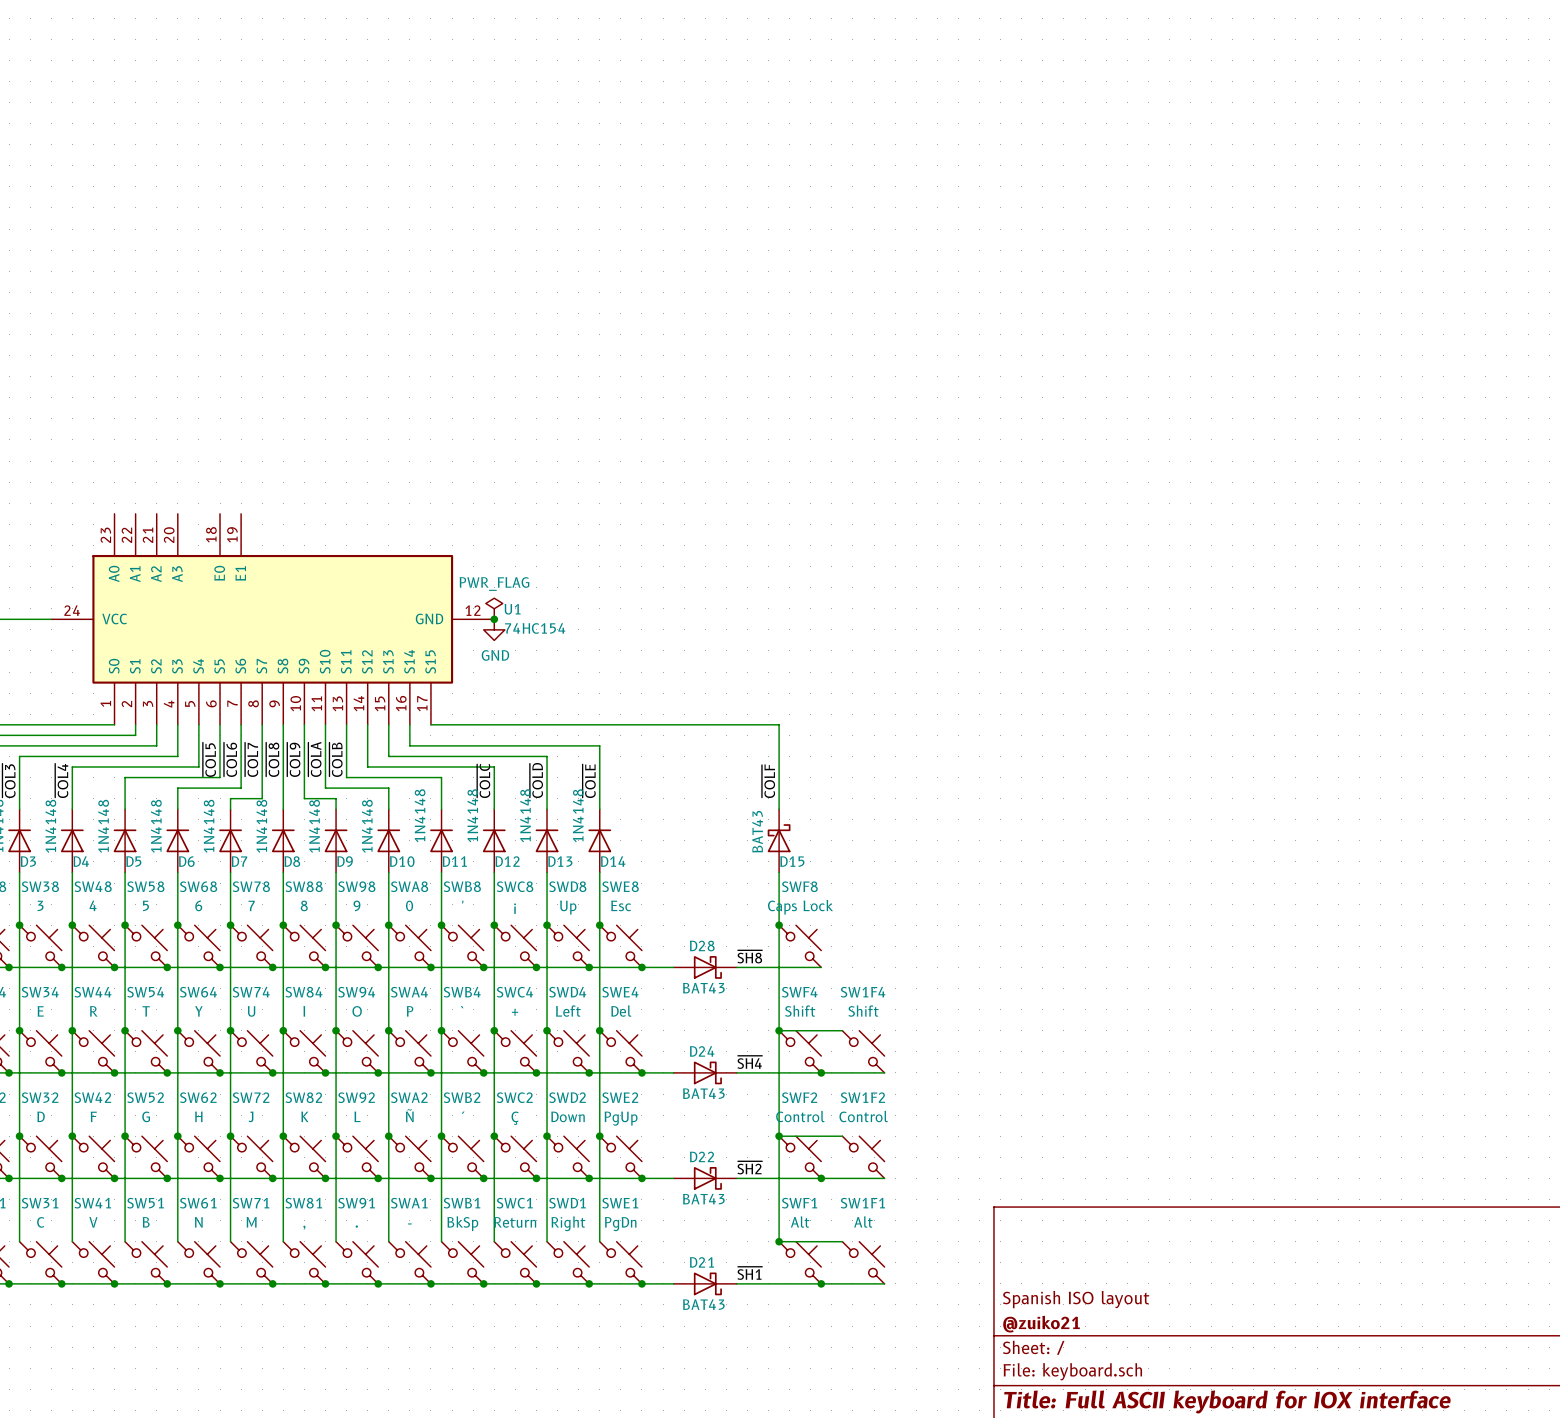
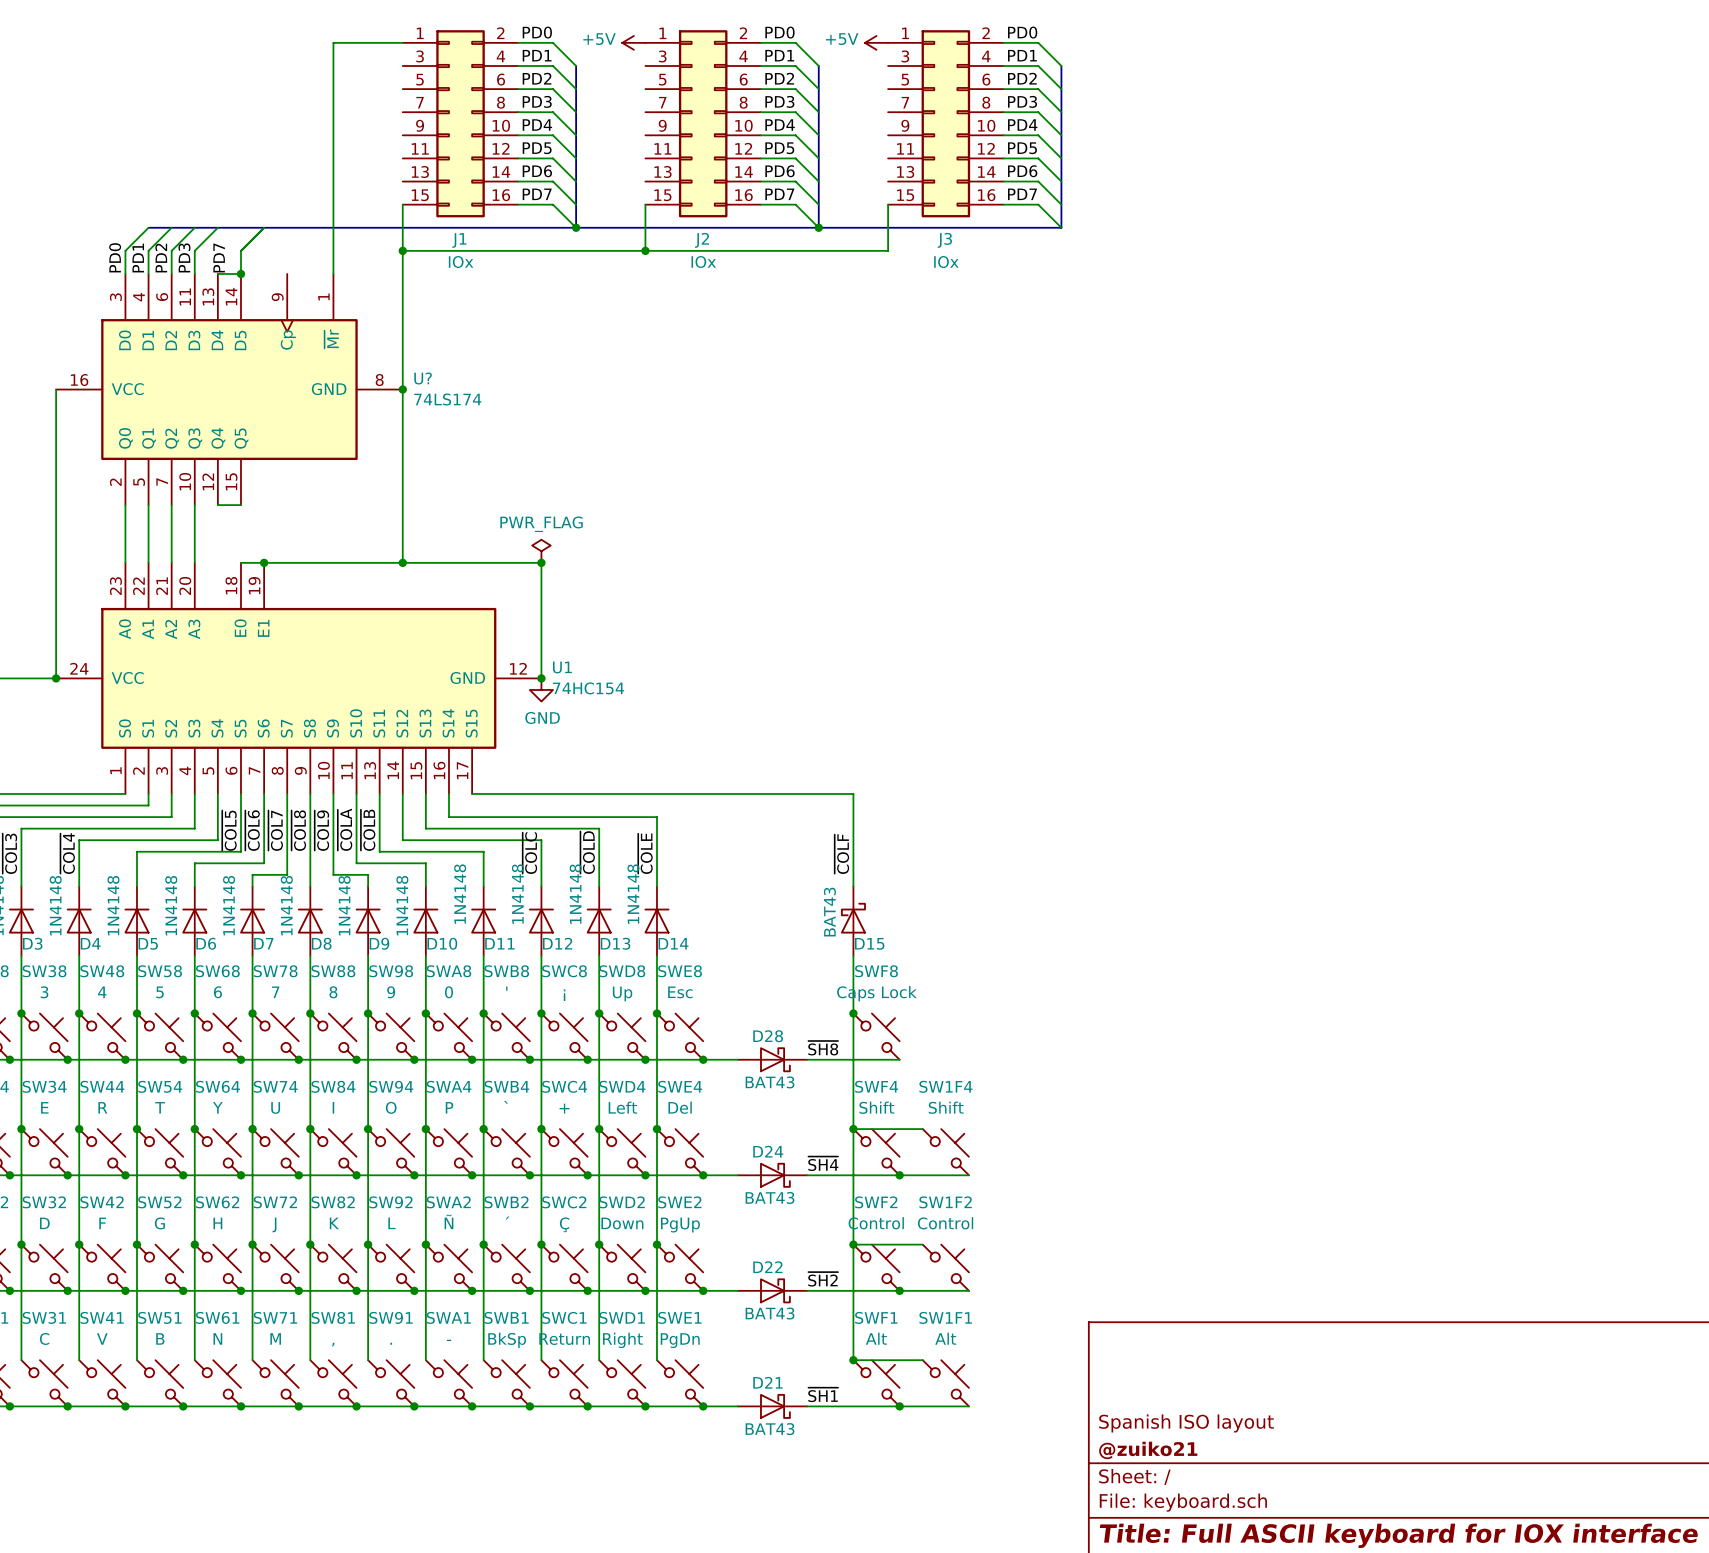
label: none -> PD0 (537, 32)
label: none -> PD0 (779, 32)
label: none -> PD0 (1022, 32)
wire: none -> (402, 42) (333, 42) (333, 273)
wire: none -> (518, 42) (552, 42) (576, 65)
power symbol: none -> +5V (633, 42)
wire: none -> (760, 42) (795, 42) (818, 65)
power symbol: none -> +5V (876, 42)
wire: none -> (1003, 42) (1038, 42) (1061, 65)
label: none -> PD1 (537, 55)
label: none -> PD1 (779, 55)
label: none -> PD1 (1022, 55)
wire: none -> (518, 65) (552, 65) (576, 89)
bus: none -> (576, 65) (576, 227)
wire: none -> (760, 65) (795, 65) (818, 89)
bus: none -> (818, 65) (818, 227)
wire: none -> (1003, 65) (1038, 65) (1061, 89)
bus: none -> (1061, 65) (1061, 227) (148, 227)
label: none -> PD2 (537, 78)
label: none -> PD2 (779, 78)
label: none -> PD2 (1022, 78)
wire: none -> (518, 89) (552, 89) (576, 112)
wire: none -> (760, 89) (795, 89) (818, 112)
wire: none -> (1003, 89) (1038, 89) (1061, 112)
label: none -> PD3 (537, 101)
label: none -> PD3 (779, 101)
label: none -> PD3 (1022, 101)
wire: none -> (518, 112) (552, 112) (576, 135)
wire: none -> (760, 112) (795, 112) (818, 135)
wire: none -> (1003, 112) (1038, 112) (1061, 135)
J1: none -> IOx (460, 123)
J2: none -> IOx (703, 123)
J3: none -> IOx (945, 123)
label: none -> PD4 (537, 125)
label: none -> PD4 (780, 125)
label: none -> PD4 (1022, 125)
wire: none -> (518, 135) (552, 135) (576, 158)
wire: none -> (760, 135) (795, 135) (818, 158)
wire: none -> (1003, 135) (1038, 135) (1061, 158)
label: none -> PD5 (537, 148)
label: none -> PD5 (779, 148)
label: none -> PD5 (1022, 148)
wire: none -> (518, 158) (552, 158) (576, 181)
wire: none -> (760, 158) (795, 158) (818, 181)
wire: none -> (1003, 158) (1038, 158) (1061, 181)
label: none -> PD6 (537, 171)
label: none -> PD6 (780, 171)
label: none -> PD6 (1022, 171)
wire: none -> (518, 181) (552, 181) (576, 204)
wire: none -> (760, 181) (795, 181) (818, 204)
wire: none -> (1003, 181) (1038, 181) (1061, 204)
label: none -> PD7 (537, 194)
label: none -> PD7 (779, 194)
label: none -> PD7 (1022, 194)
wire: none -> (402, 204) (402, 562)
wire: none -> (518, 204) (552, 204) (576, 227)
wire: none -> (645, 204) (645, 250)
wire: none -> (760, 204) (795, 204) (818, 227)
wire: none -> (888, 204) (888, 250) (402, 250)
wire: none -> (1003, 204) (1038, 204) (1061, 227)
wire: none -> (148, 227) (125, 250) (125, 273)
wire: none -> (171, 227) (148, 250) (148, 273)
wire: none -> (194, 227) (171, 250) (171, 273)
wire: none -> (217, 227) (194, 250) (194, 273)
wire: none -> (264, 227) (240, 250) (240, 273) (217, 273)
junction: none -> (576, 227)
junction: none -> (818, 227)
junction: none -> (402, 250)
junction: none -> (645, 250)
label: none -> PD0 (115, 257)
label: none -> PD1 (138, 258)
label: none -> PD2 (161, 258)
label: none -> PD3 (184, 257)
label: none -> PD7 (219, 257)
junction: none -> (240, 273)
wire: none -> (56, 389) (56, 678)
U?: none -> 74LS174 (229, 389)
junction: none -> (402, 389)
wire: none -> (125, 505) (125, 562)
wire: none -> (148, 505) (148, 562)
wire: none -> (171, 505) (171, 562)
wire: none -> (194, 505) (194, 562)
wire: none -> (217, 505) (240, 505)
wire: none -> (240, 562) (541, 562) (541, 678)
junction: none -> (264, 562)
junction: none -> (402, 562)
junction: none -> (541, 562)
power symbol position: PWR_FLAG (494, 608) -> PWR_FLAG (541, 551)
junction: none -> (56, 678)

